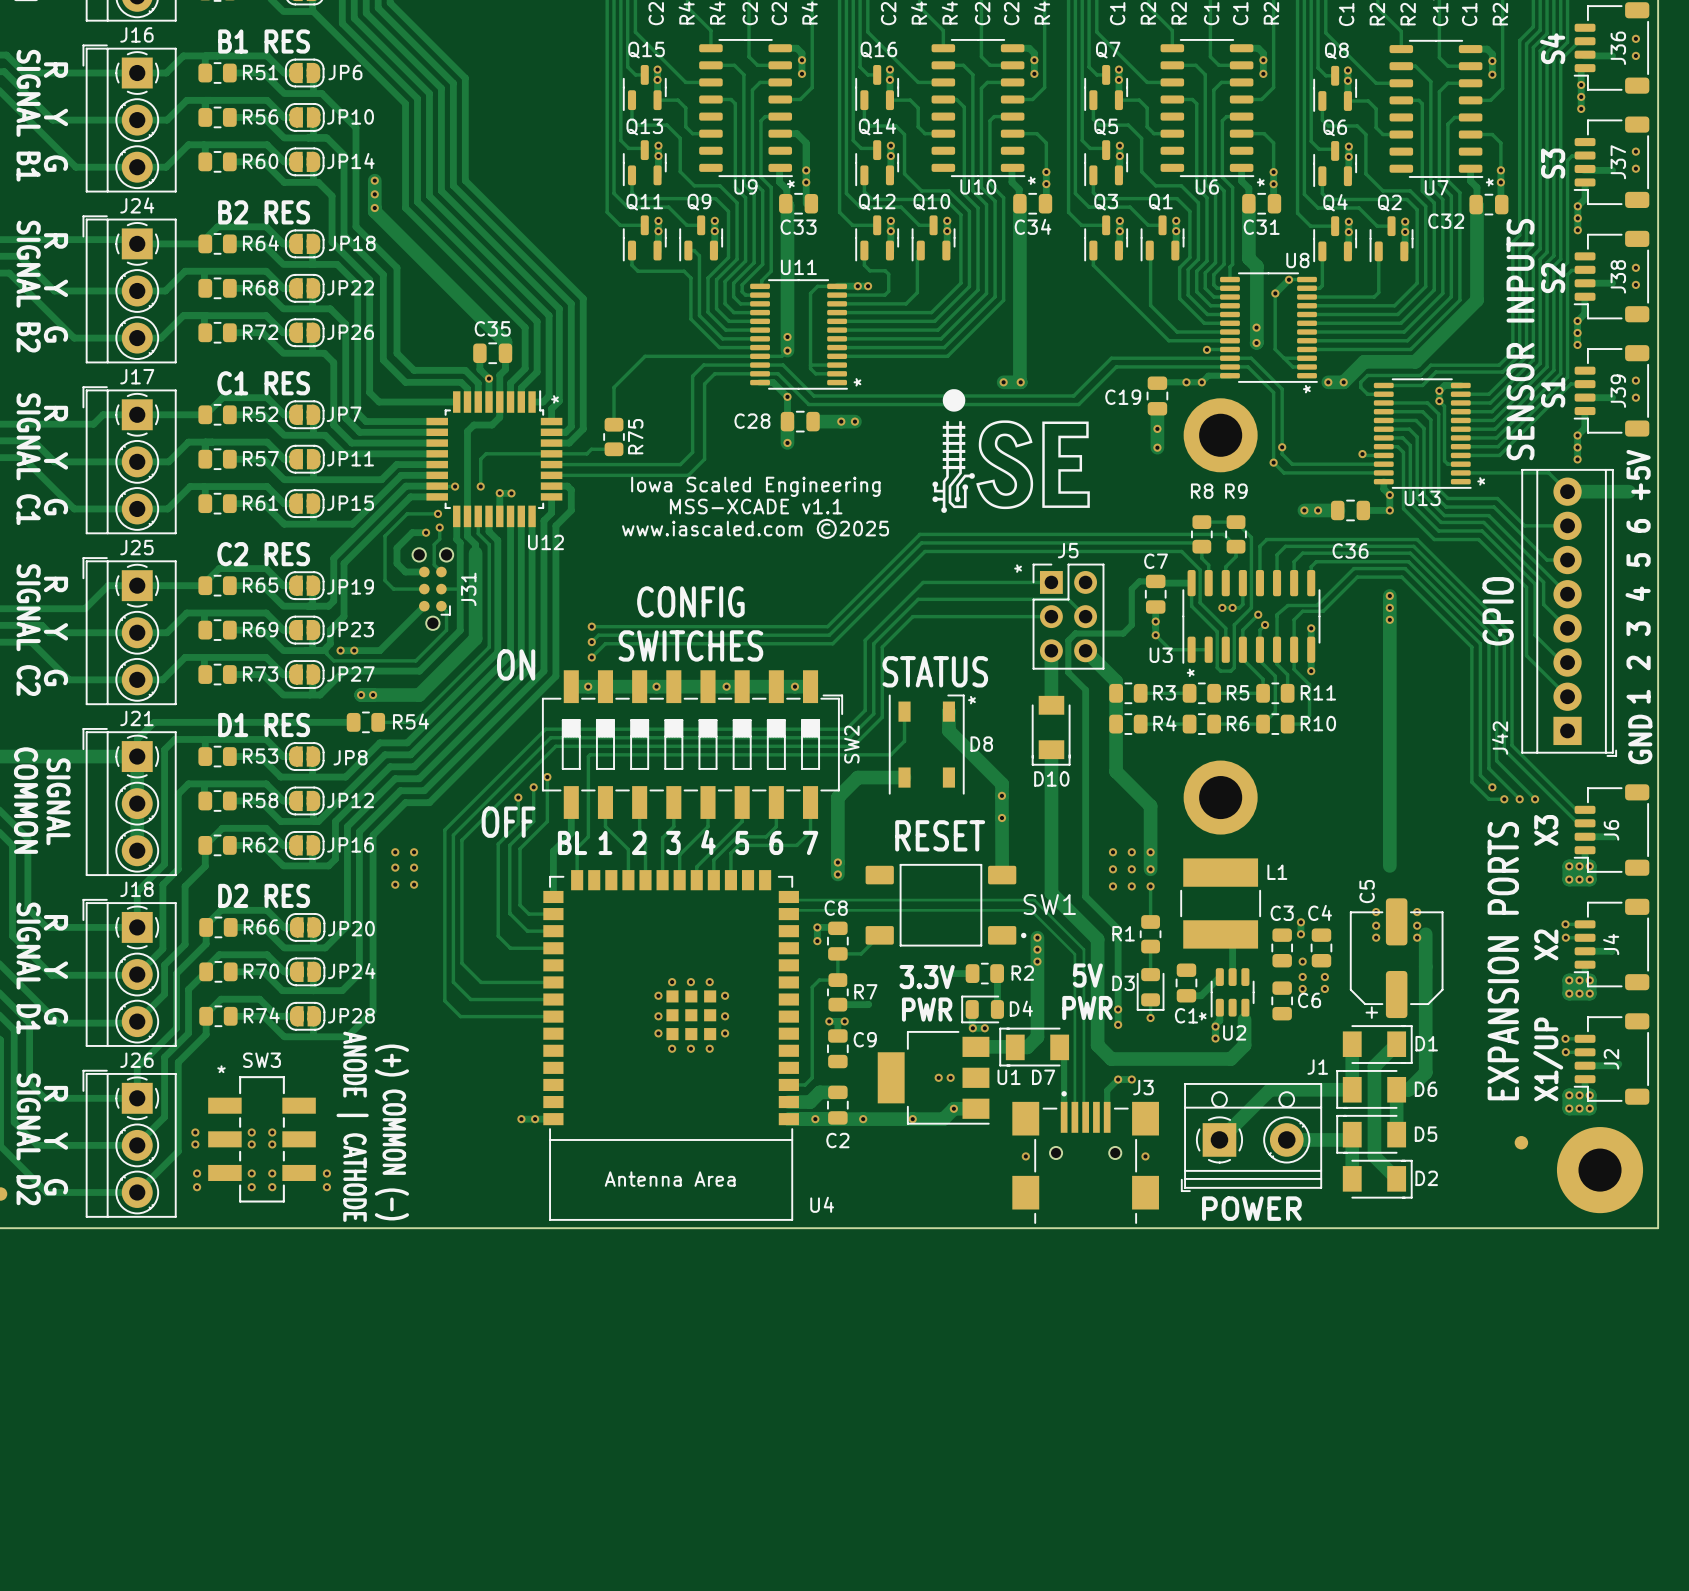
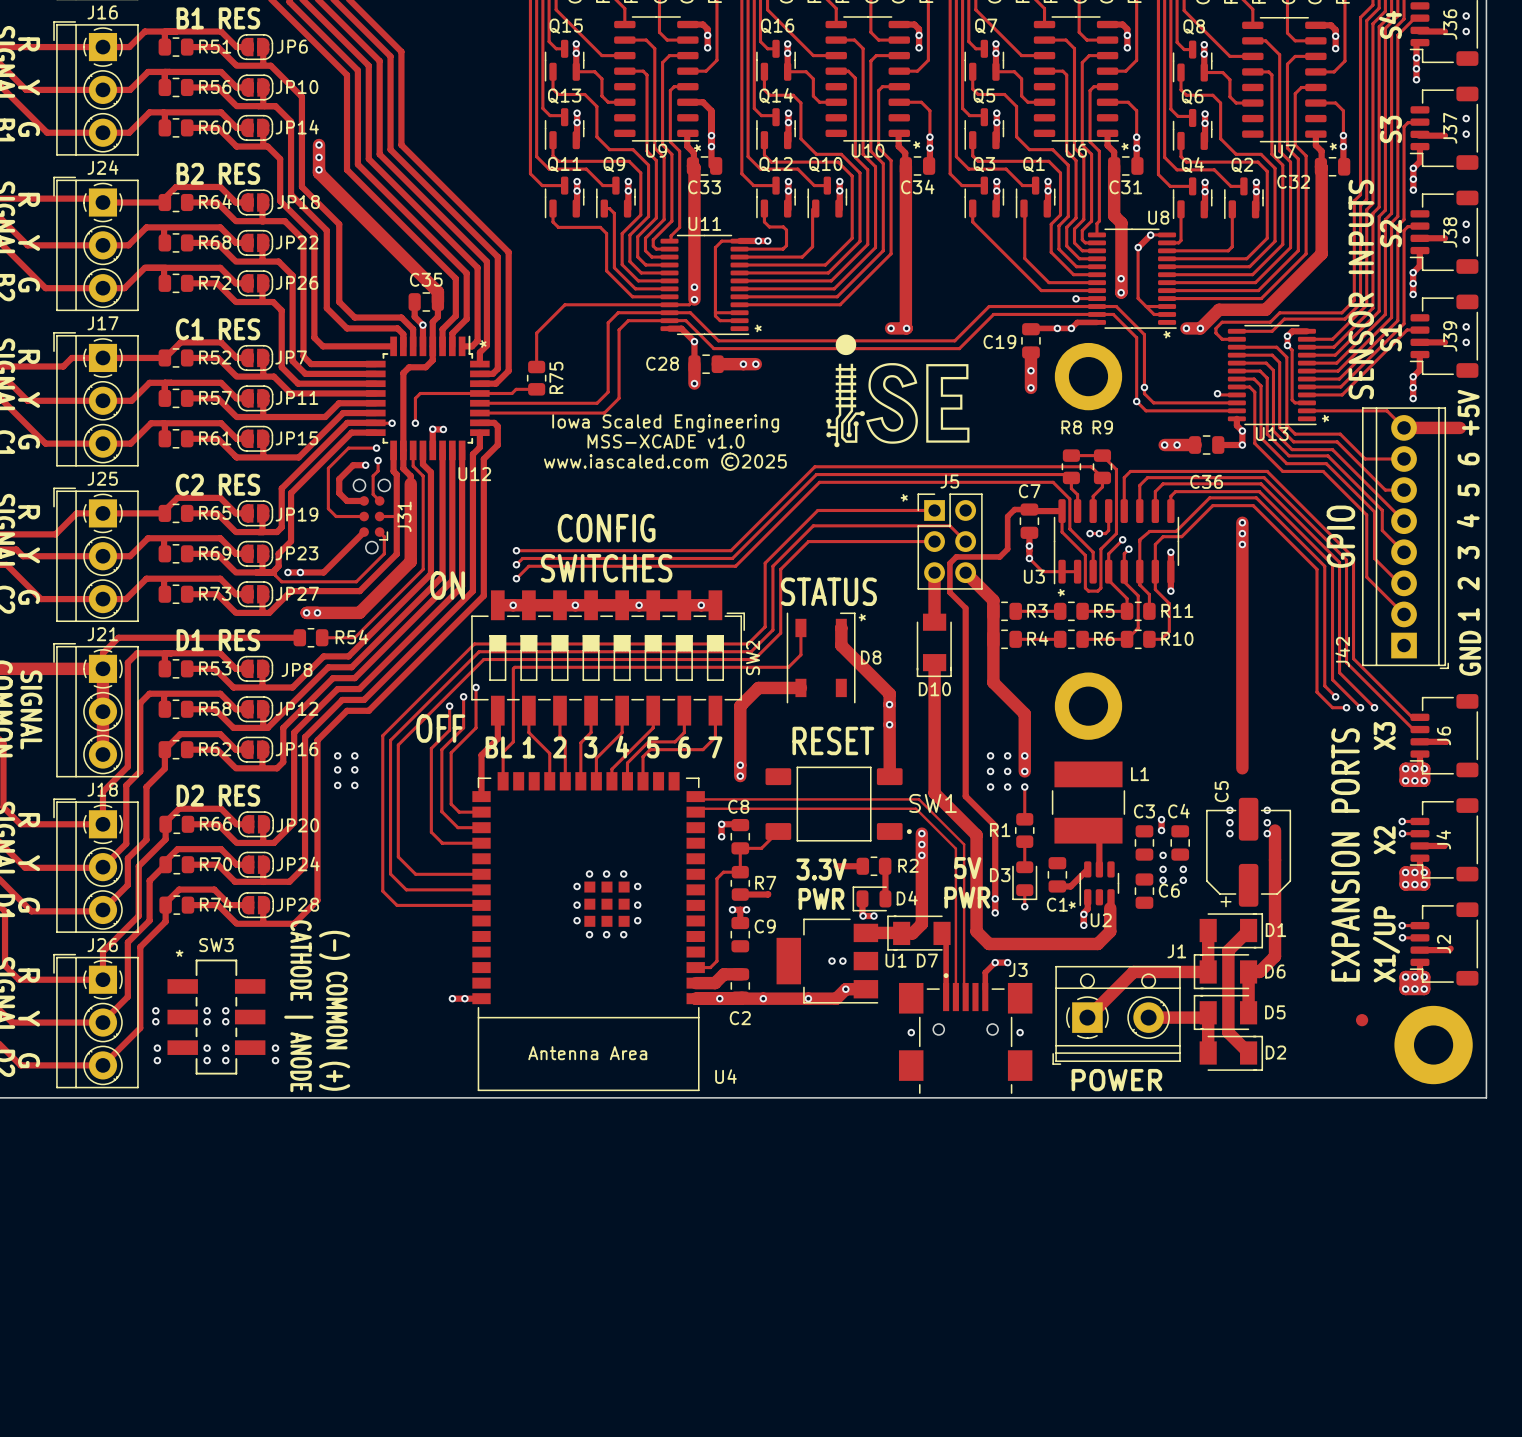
text: MSS-XCADE v1.1 (756, 506) -> MSS-XCADE v1.0 (665, 441)
text: ANODE | CATHODE (352, 1126) -> CATHODE | ANODE (298, 1006)
text: (+) COMMON (-) (391, 1132) -> (-) COMMON (+) (334, 1010)

